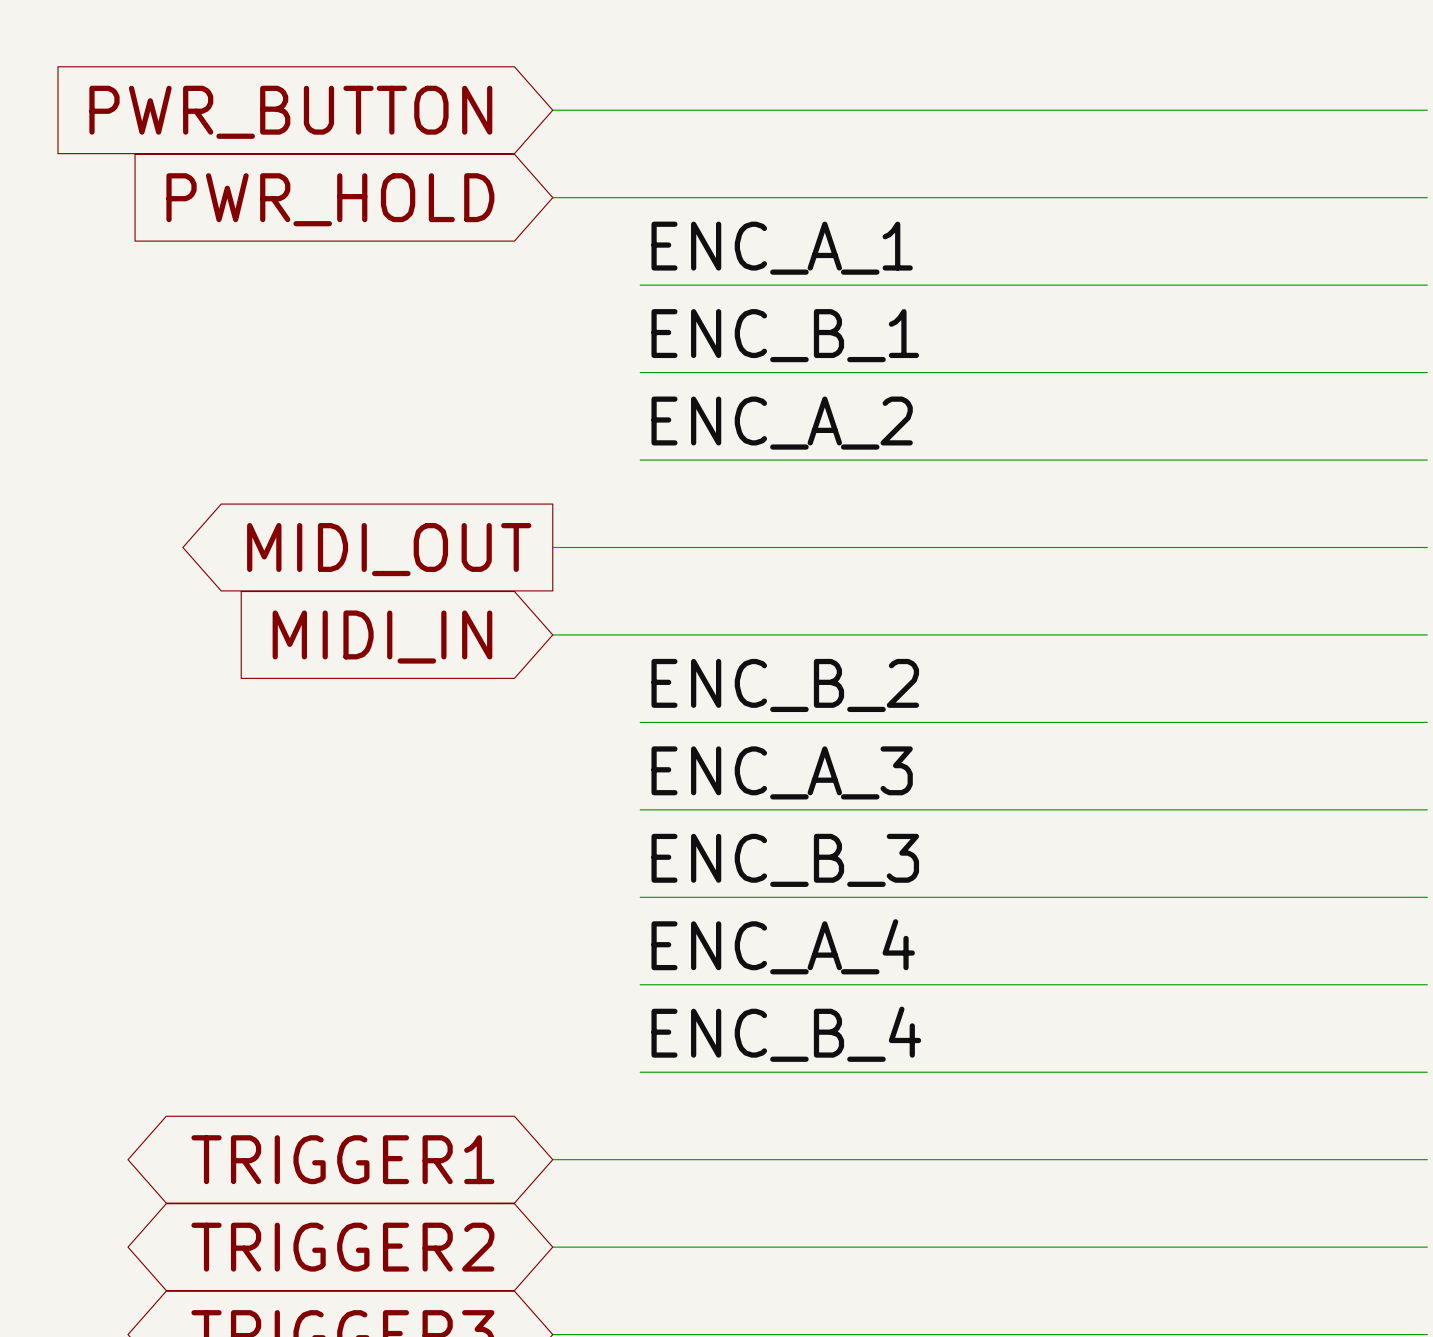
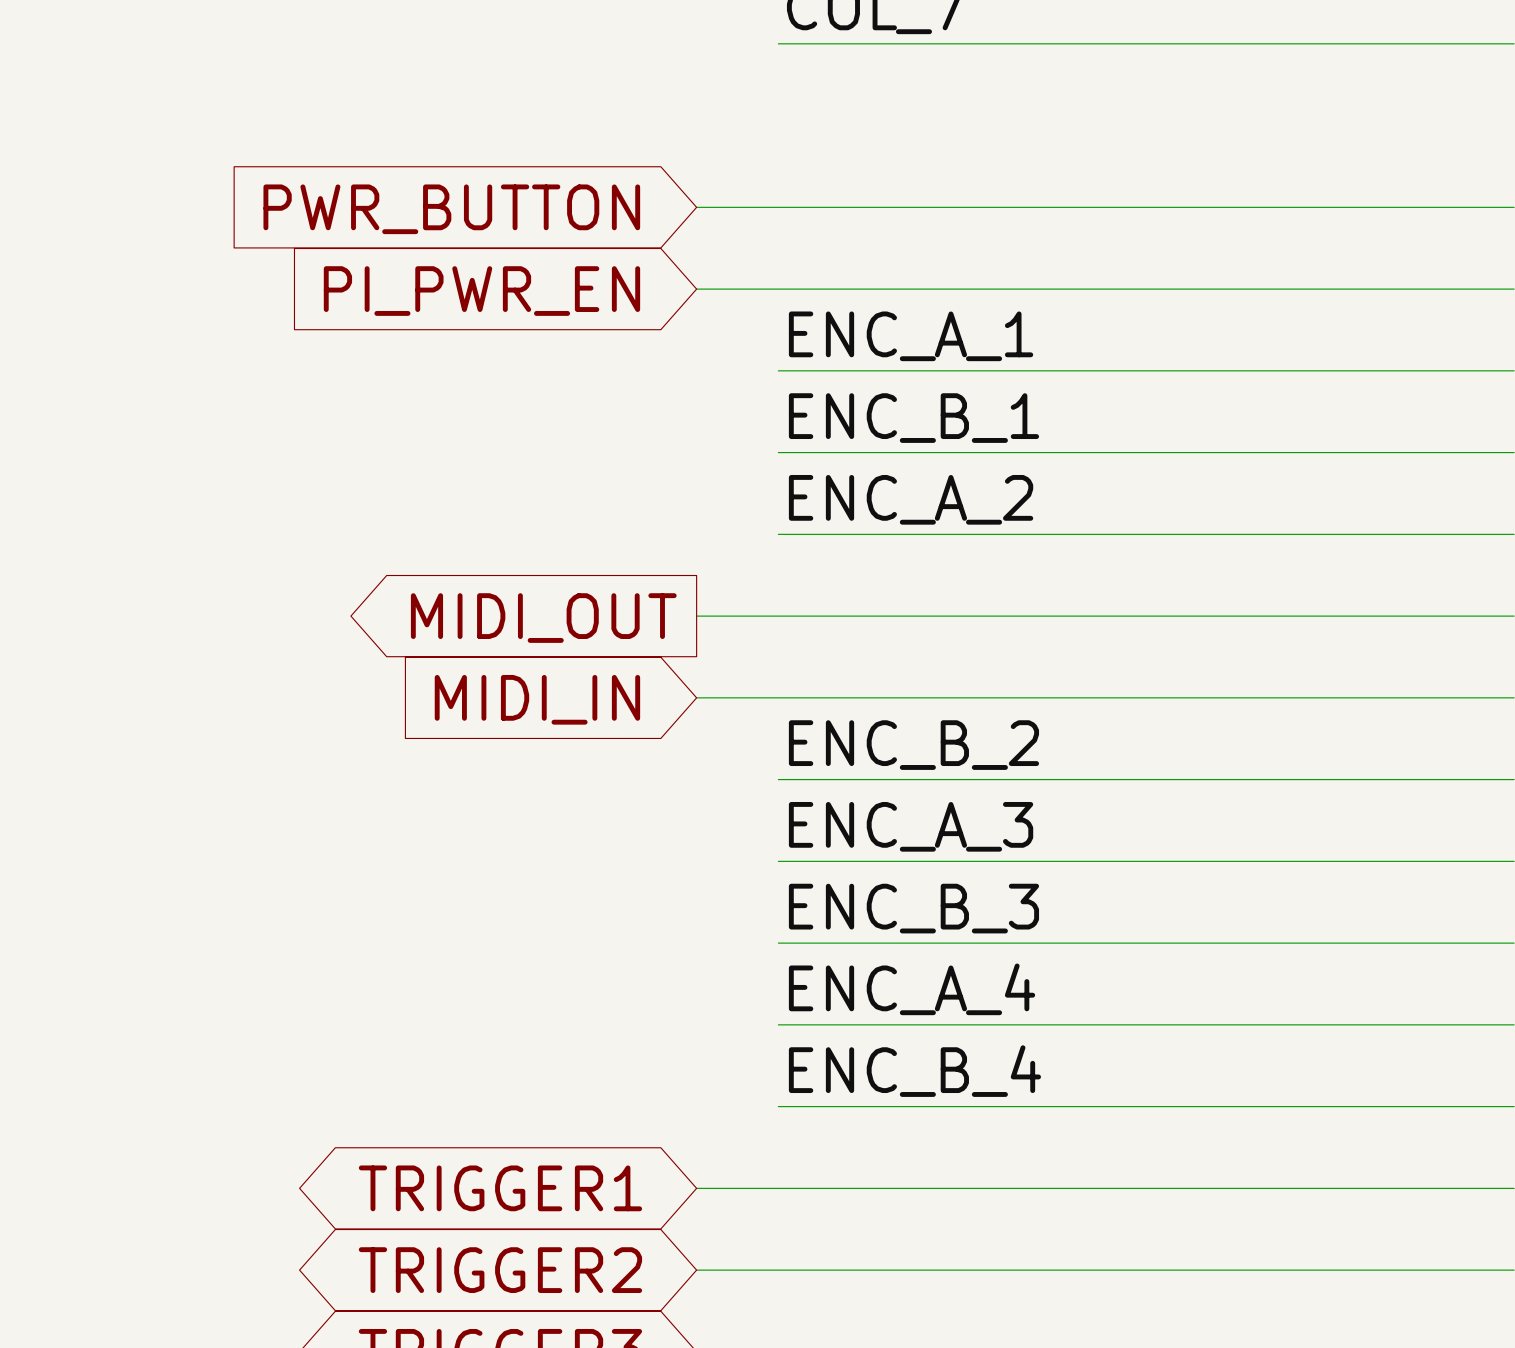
global label: PWR_HOLD (330, 199) -> PI_PWR_EN (481, 291)

